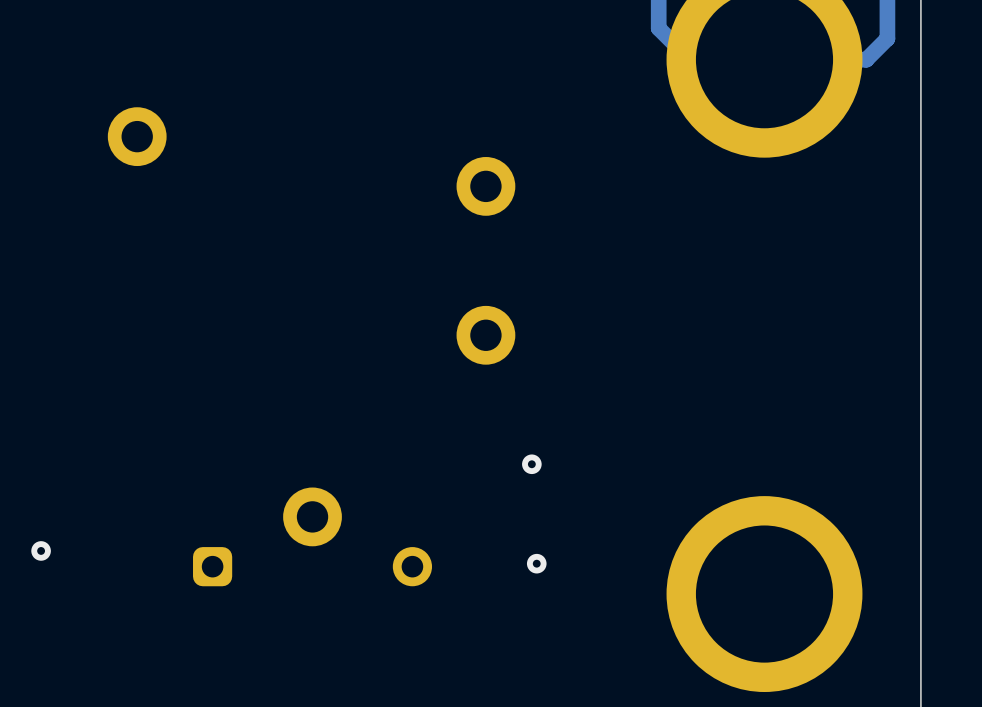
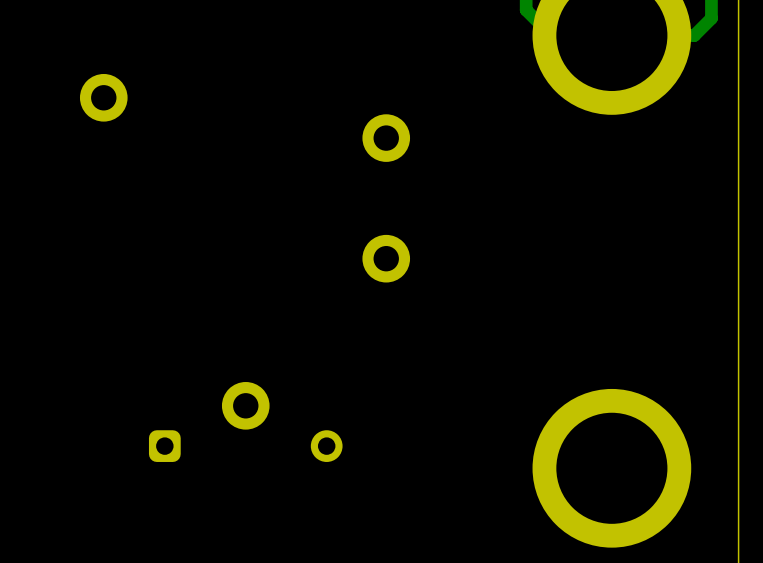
via: (531, 464) -> none
via: (41, 550) -> none
via: (536, 563) -> none

